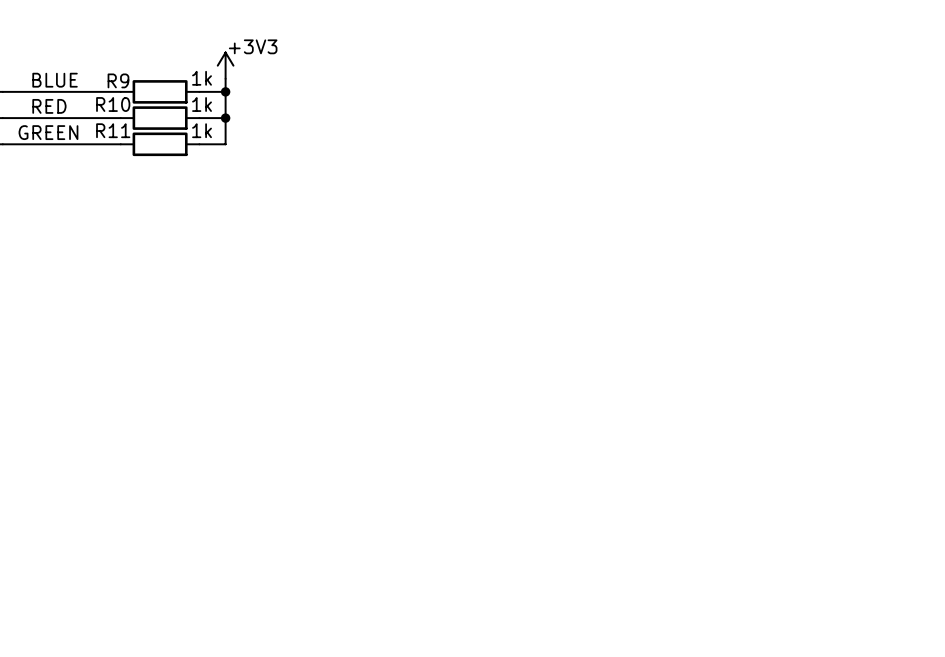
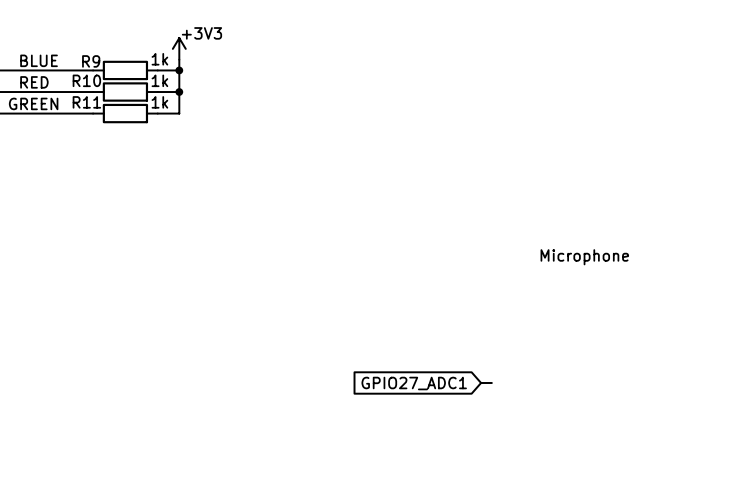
text: none -> Microphone (584, 257)
wire: none -> (481, 382) (491, 382)
global label: none -> GPIO27_ADC1 (414, 383)

